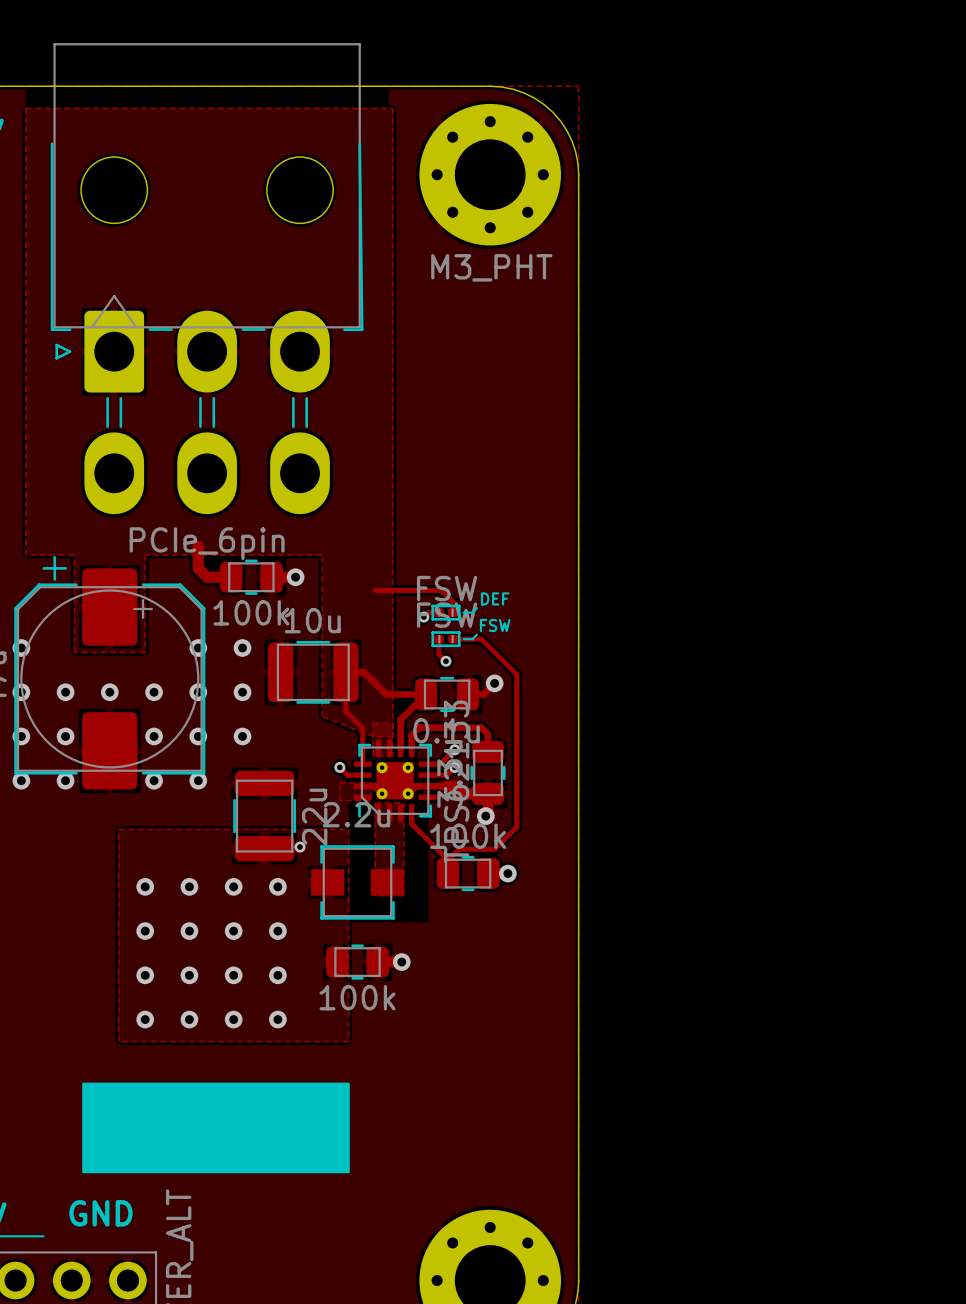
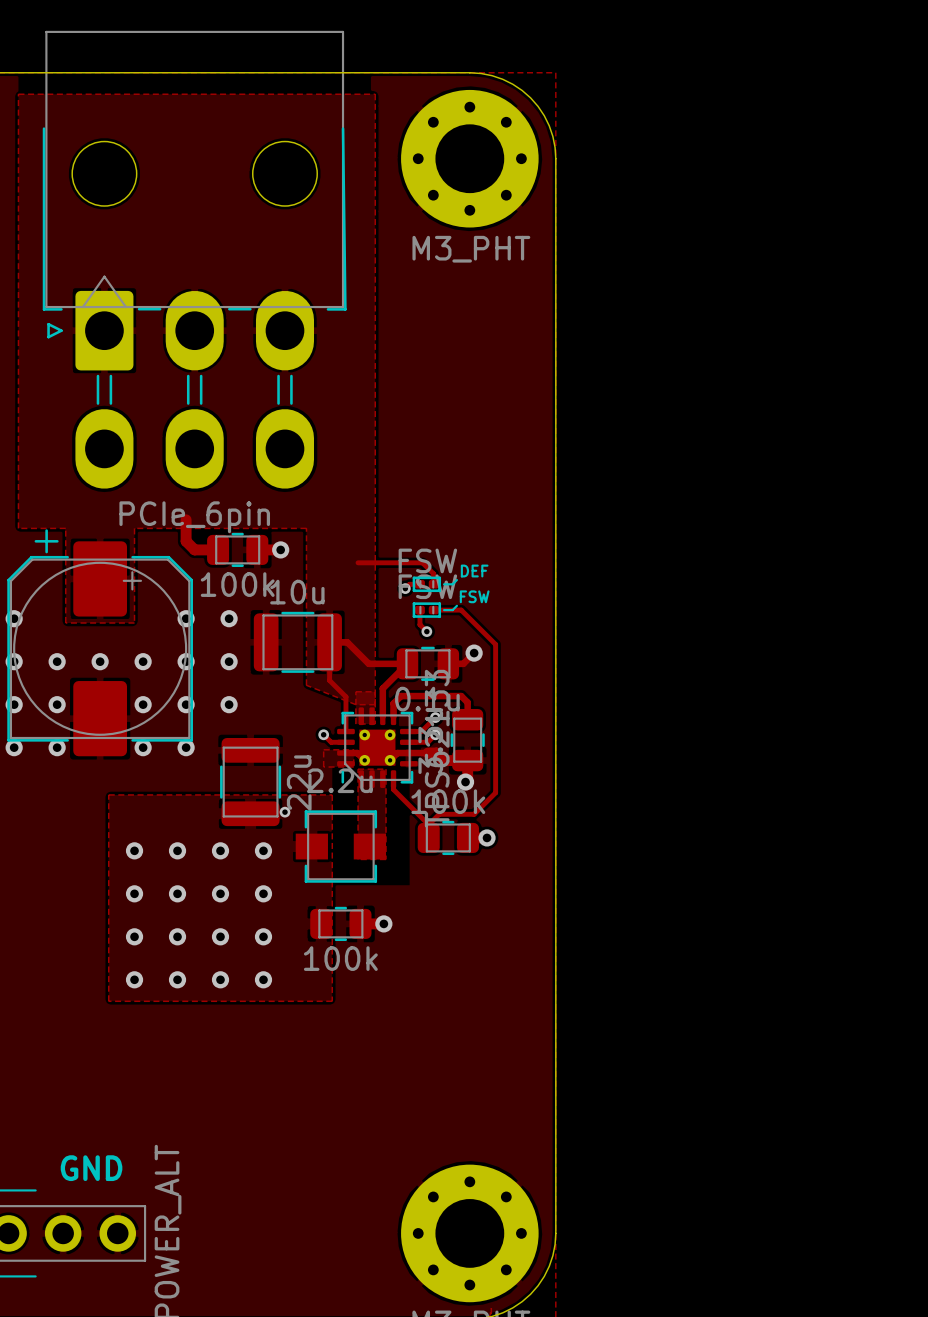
drawing: [82, 1082, 350, 1174] -> none

